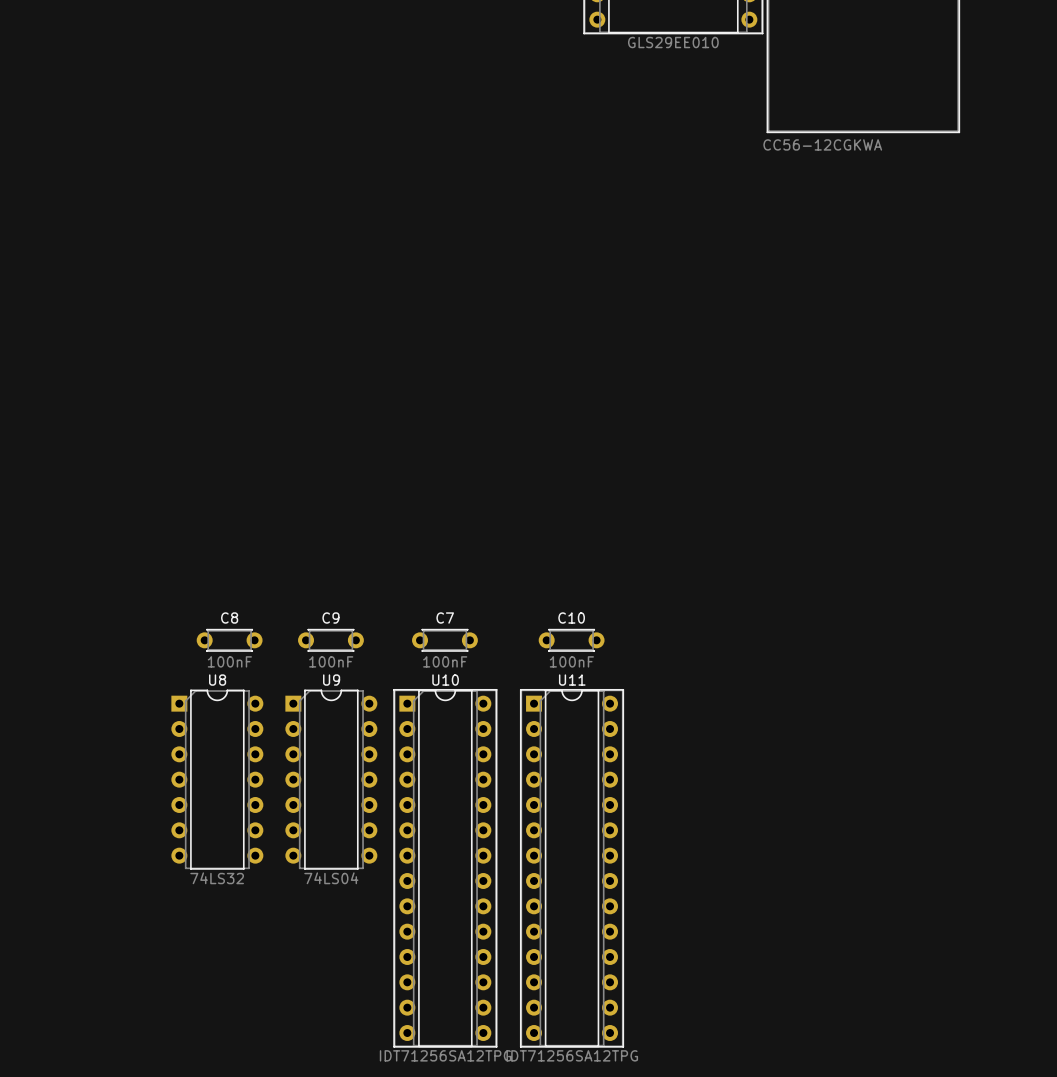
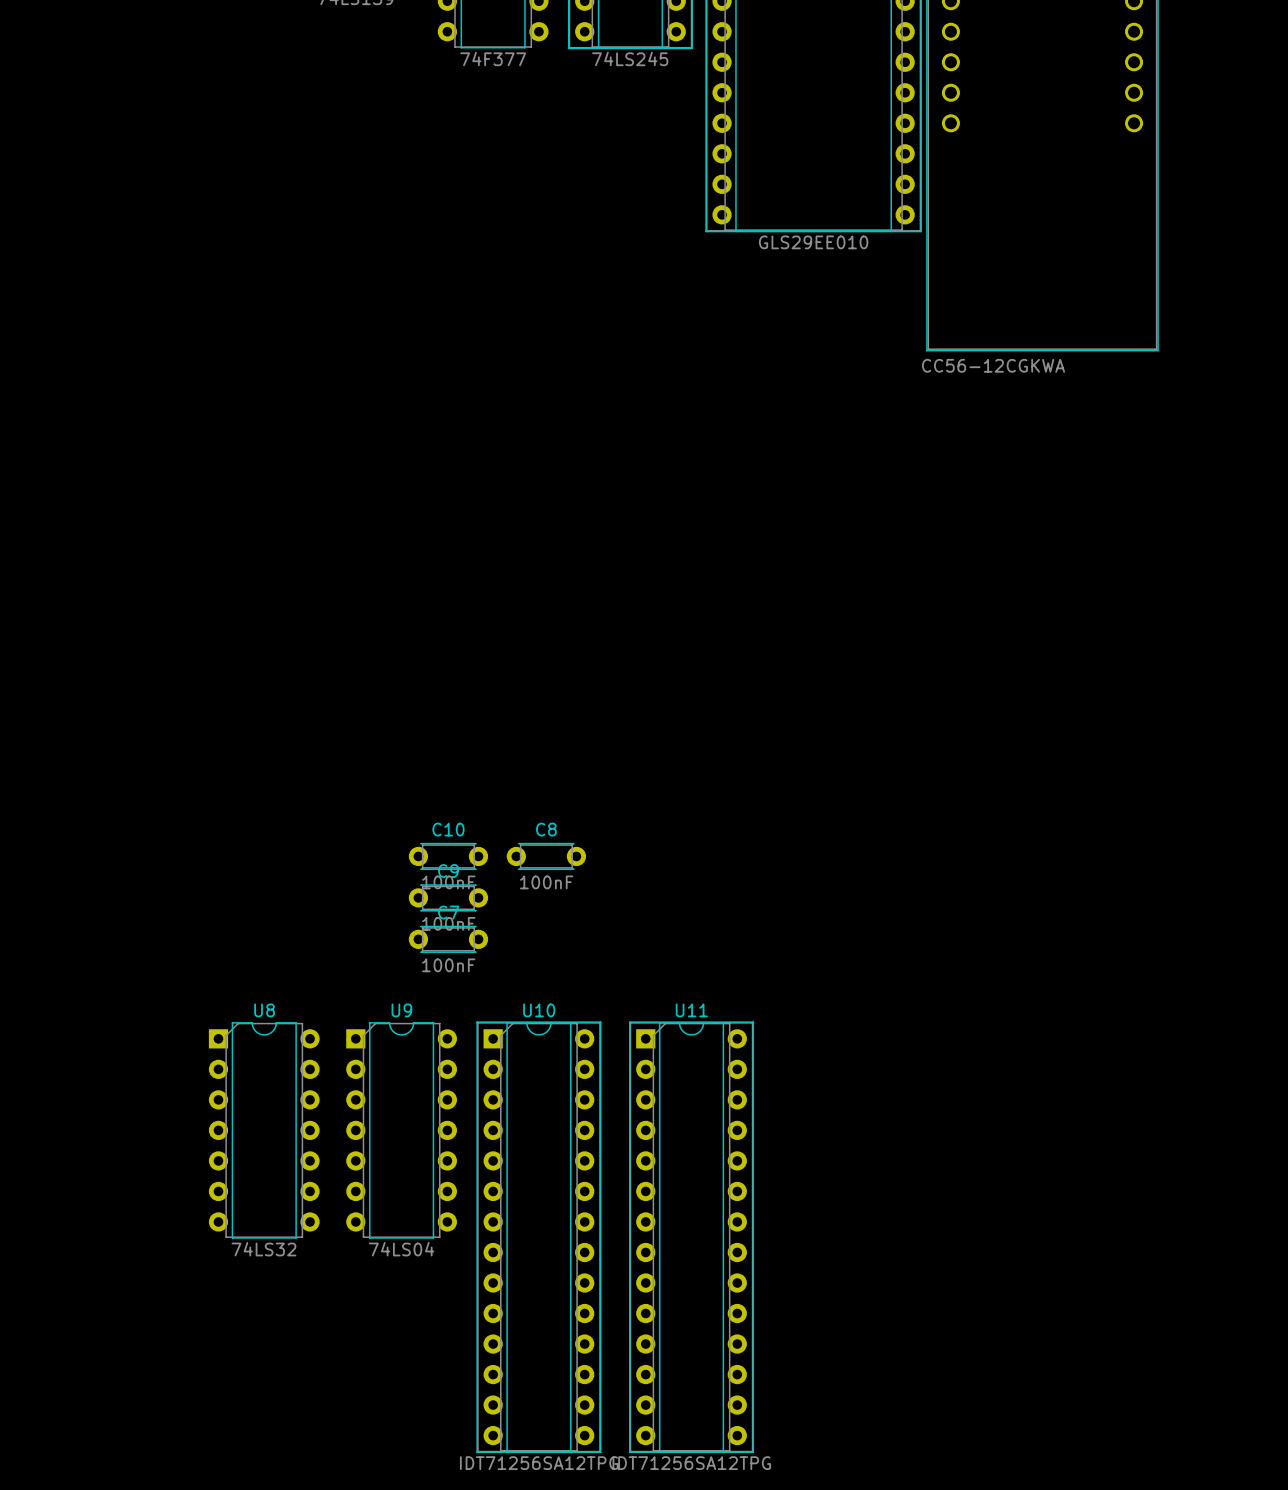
C8 position: (229, 640) -> (546, 856)
C9 position: (330, 640) -> (448, 897)
C7 position: (444, 640) -> (448, 939)
C10 position: (571, 640) -> (448, 856)

